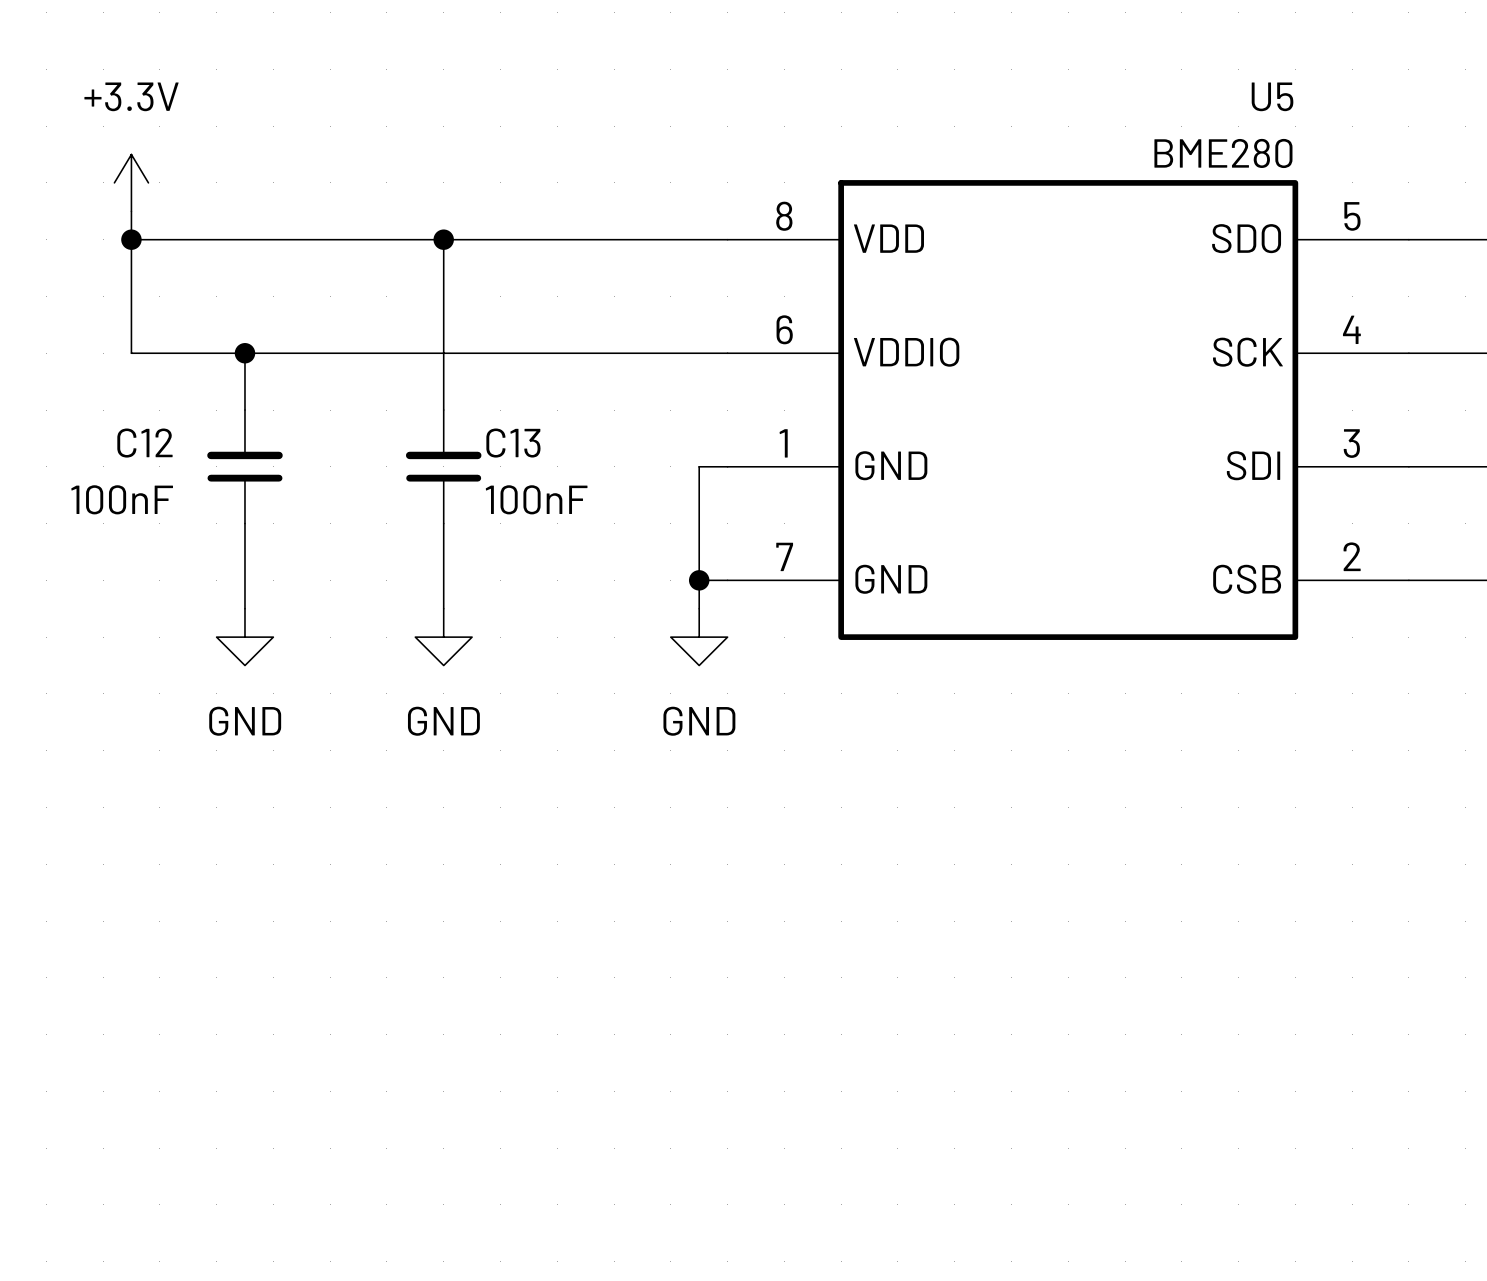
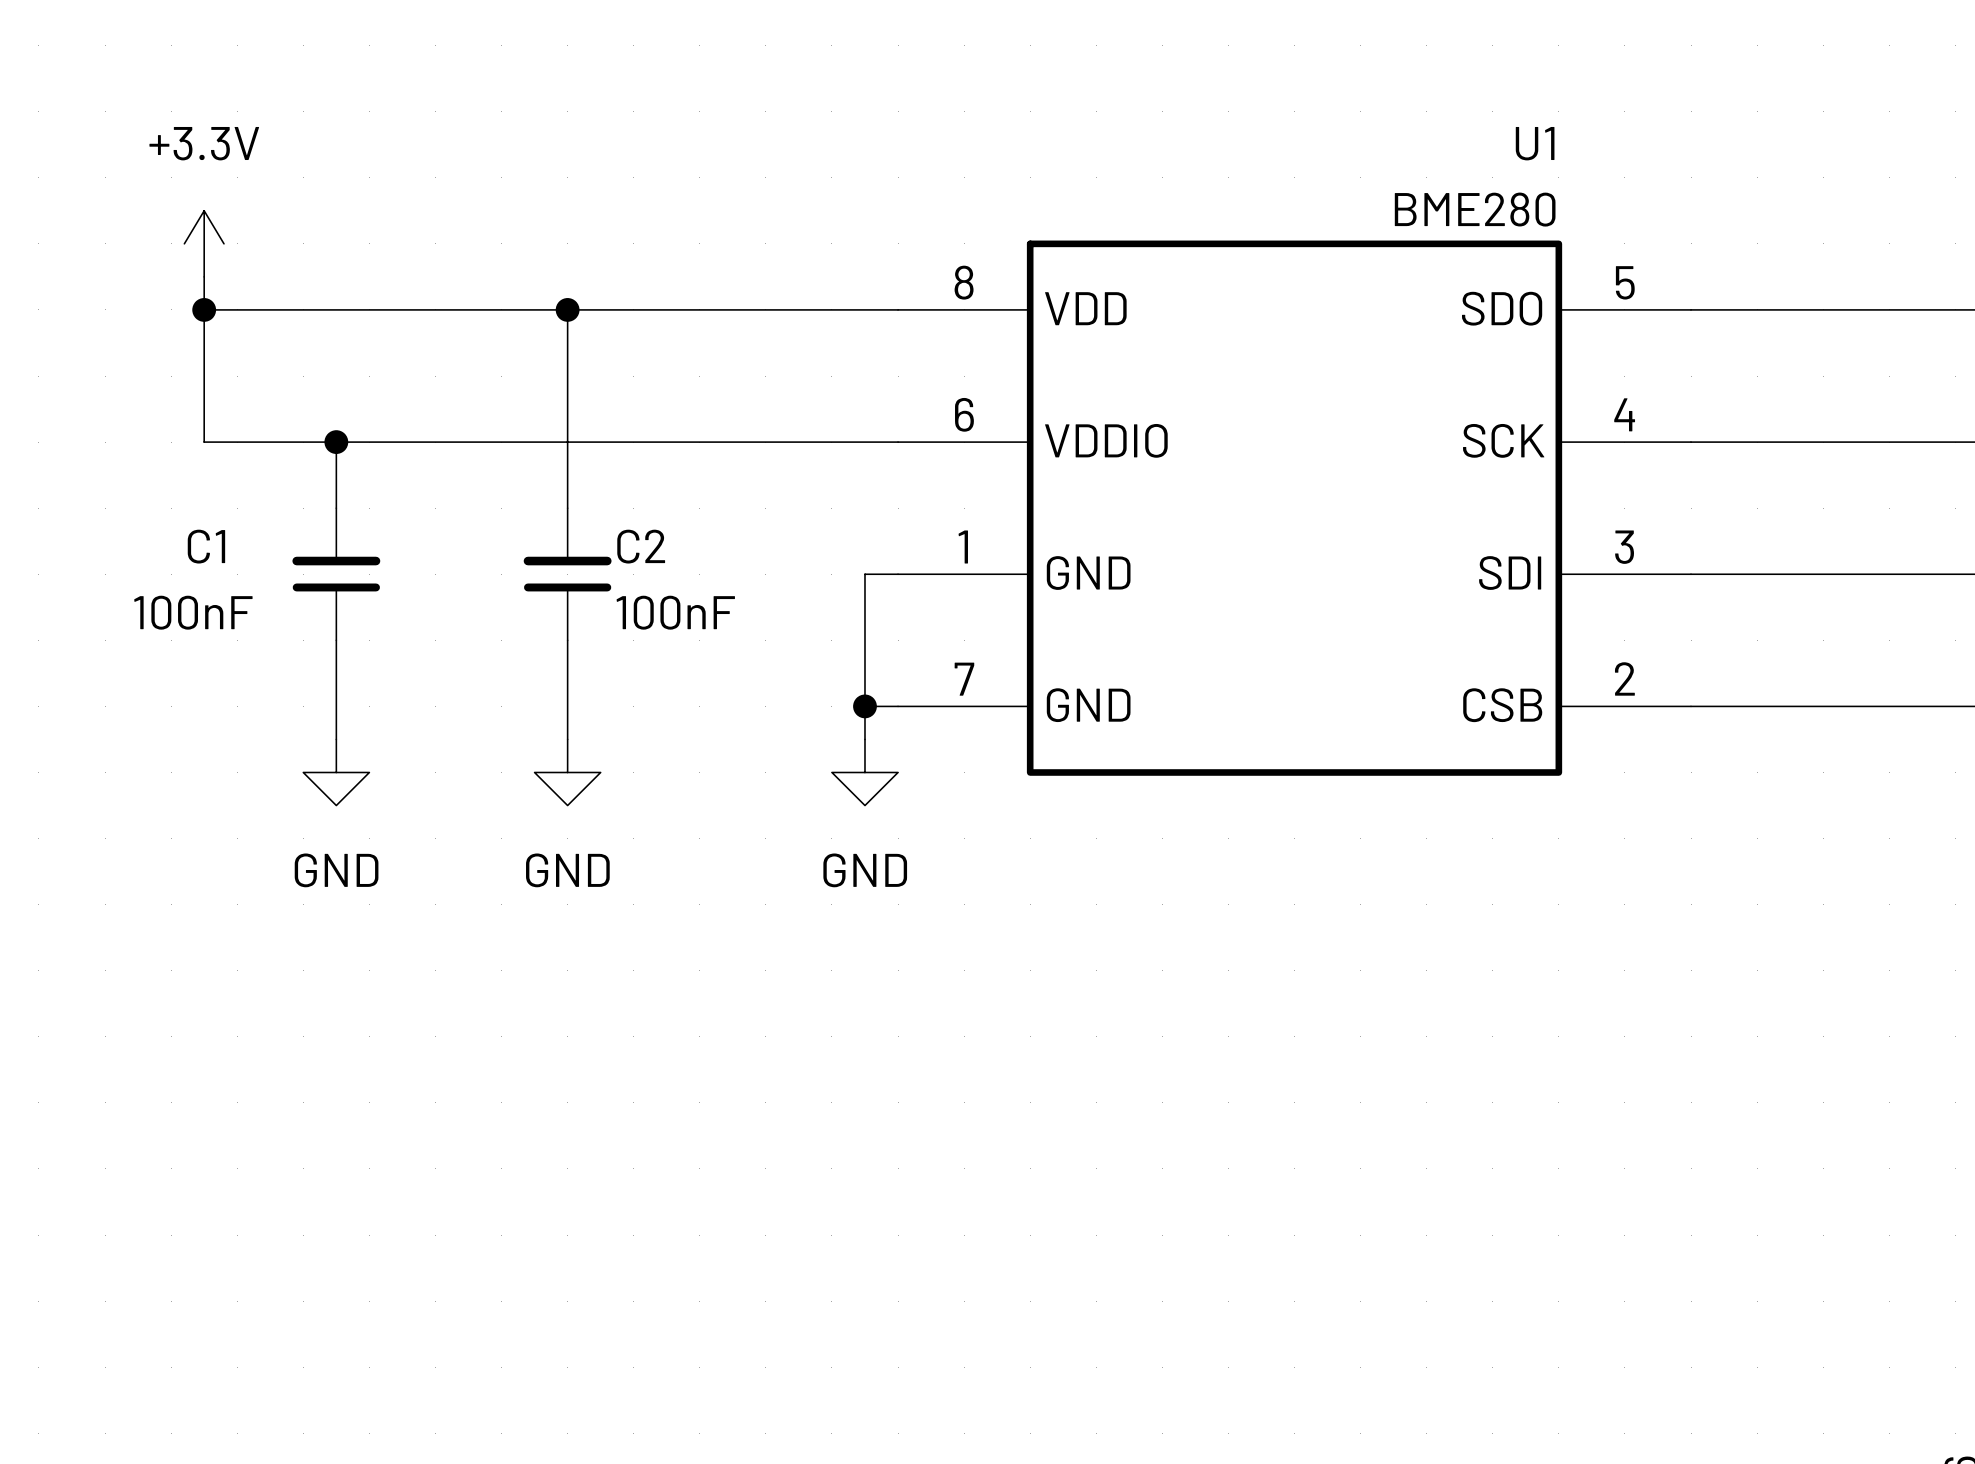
U5 name: U5 (1272, 96) -> U1 (1535, 143)
C12 name: C12 (144, 443) -> C1 (206, 546)
C13 name: C13 (513, 443) -> C2 (641, 546)

